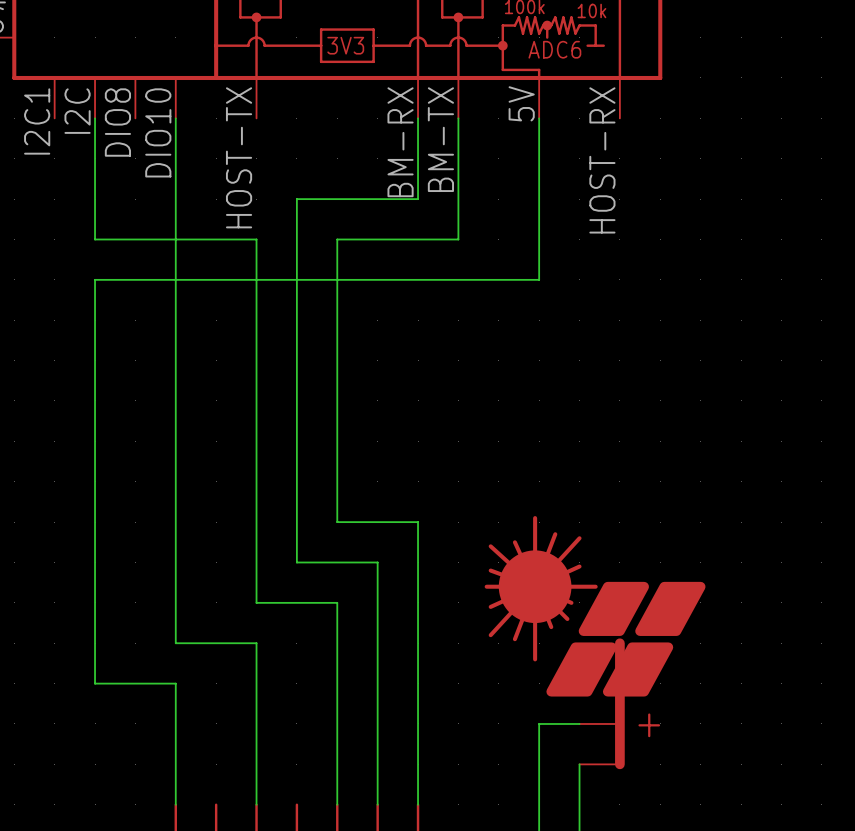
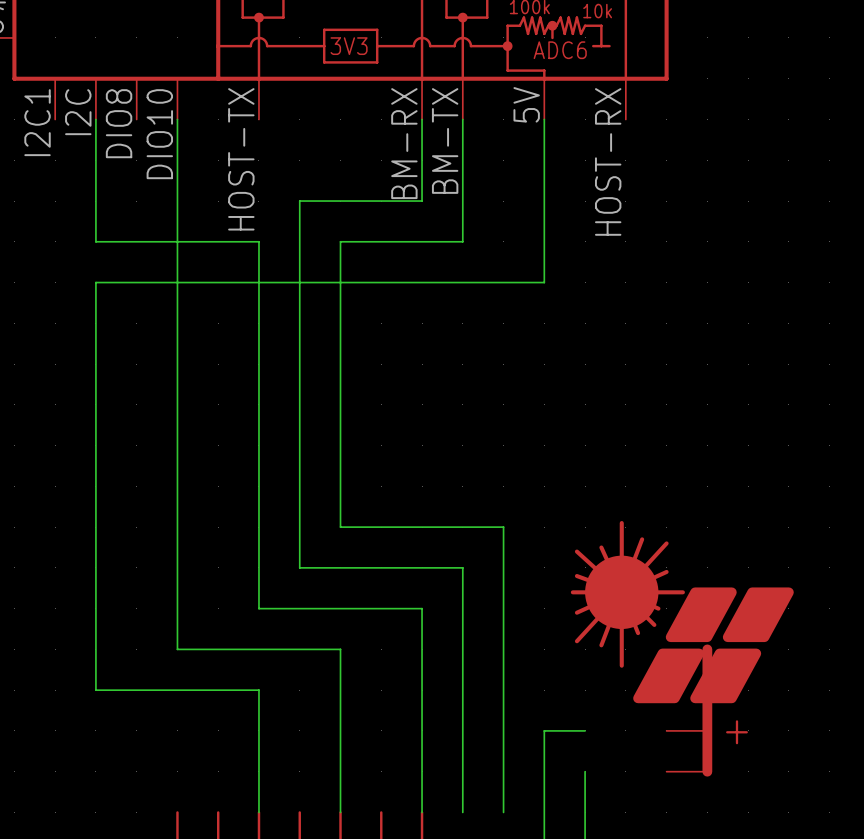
wire: (418, 522) (418, 602) -> (340, 608) (422, 608)
wire: none -> (422, 527) (503, 527) (503, 812)
wire: (377, 562) (377, 804) -> (381, 567) (462, 567) (462, 812)
wire: (337, 602) (337, 643) -> (258, 649) (340, 649)
part position: (595, 642) -> (682, 648)
wire: (256, 643) (256, 683) -> (177, 690) (258, 690)
wire: (175, 683) (175, 804) -> none

